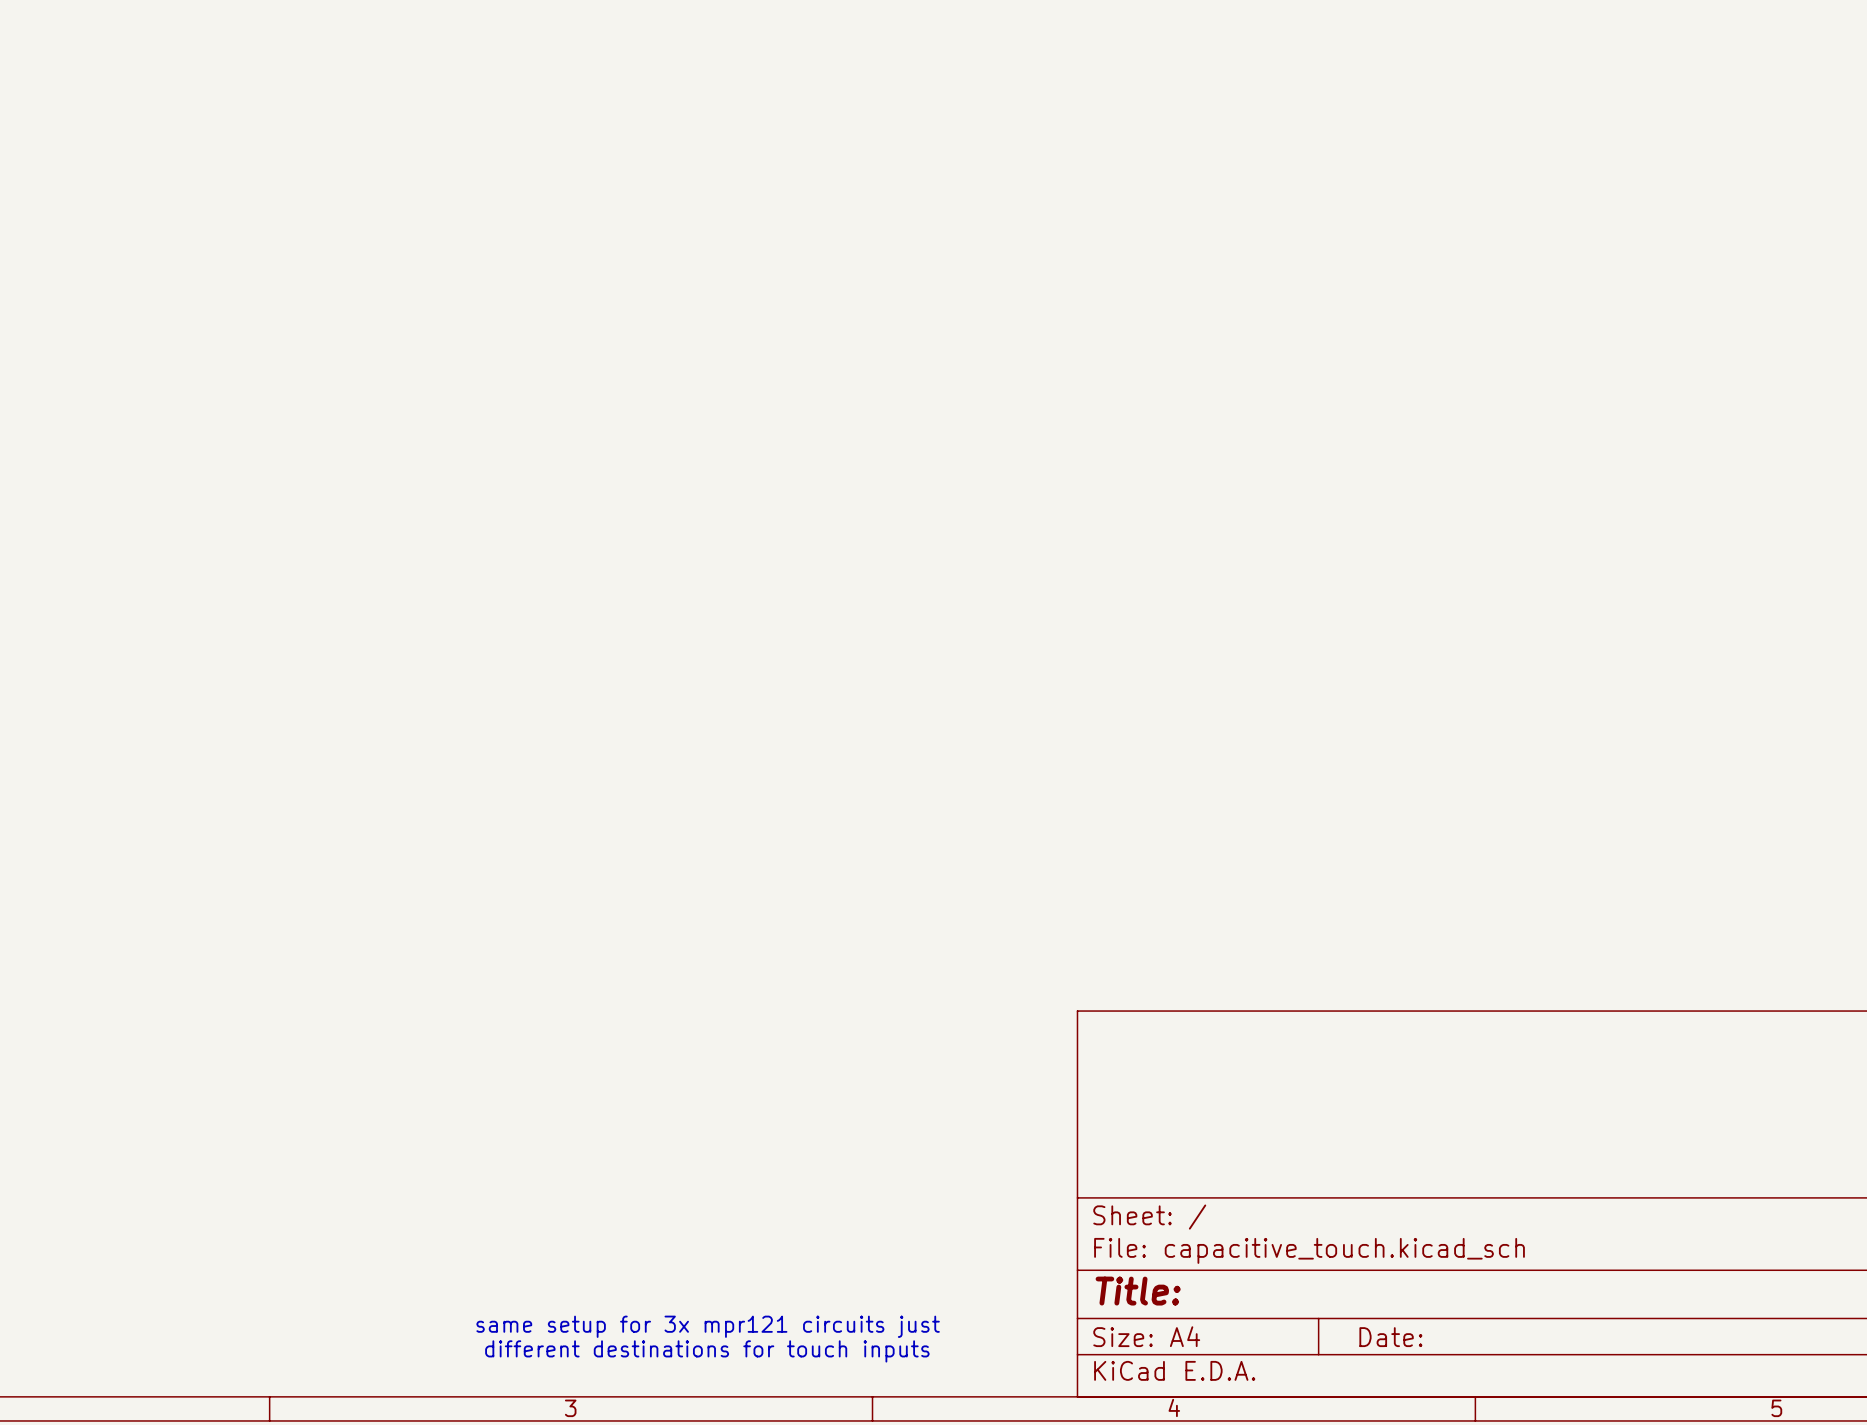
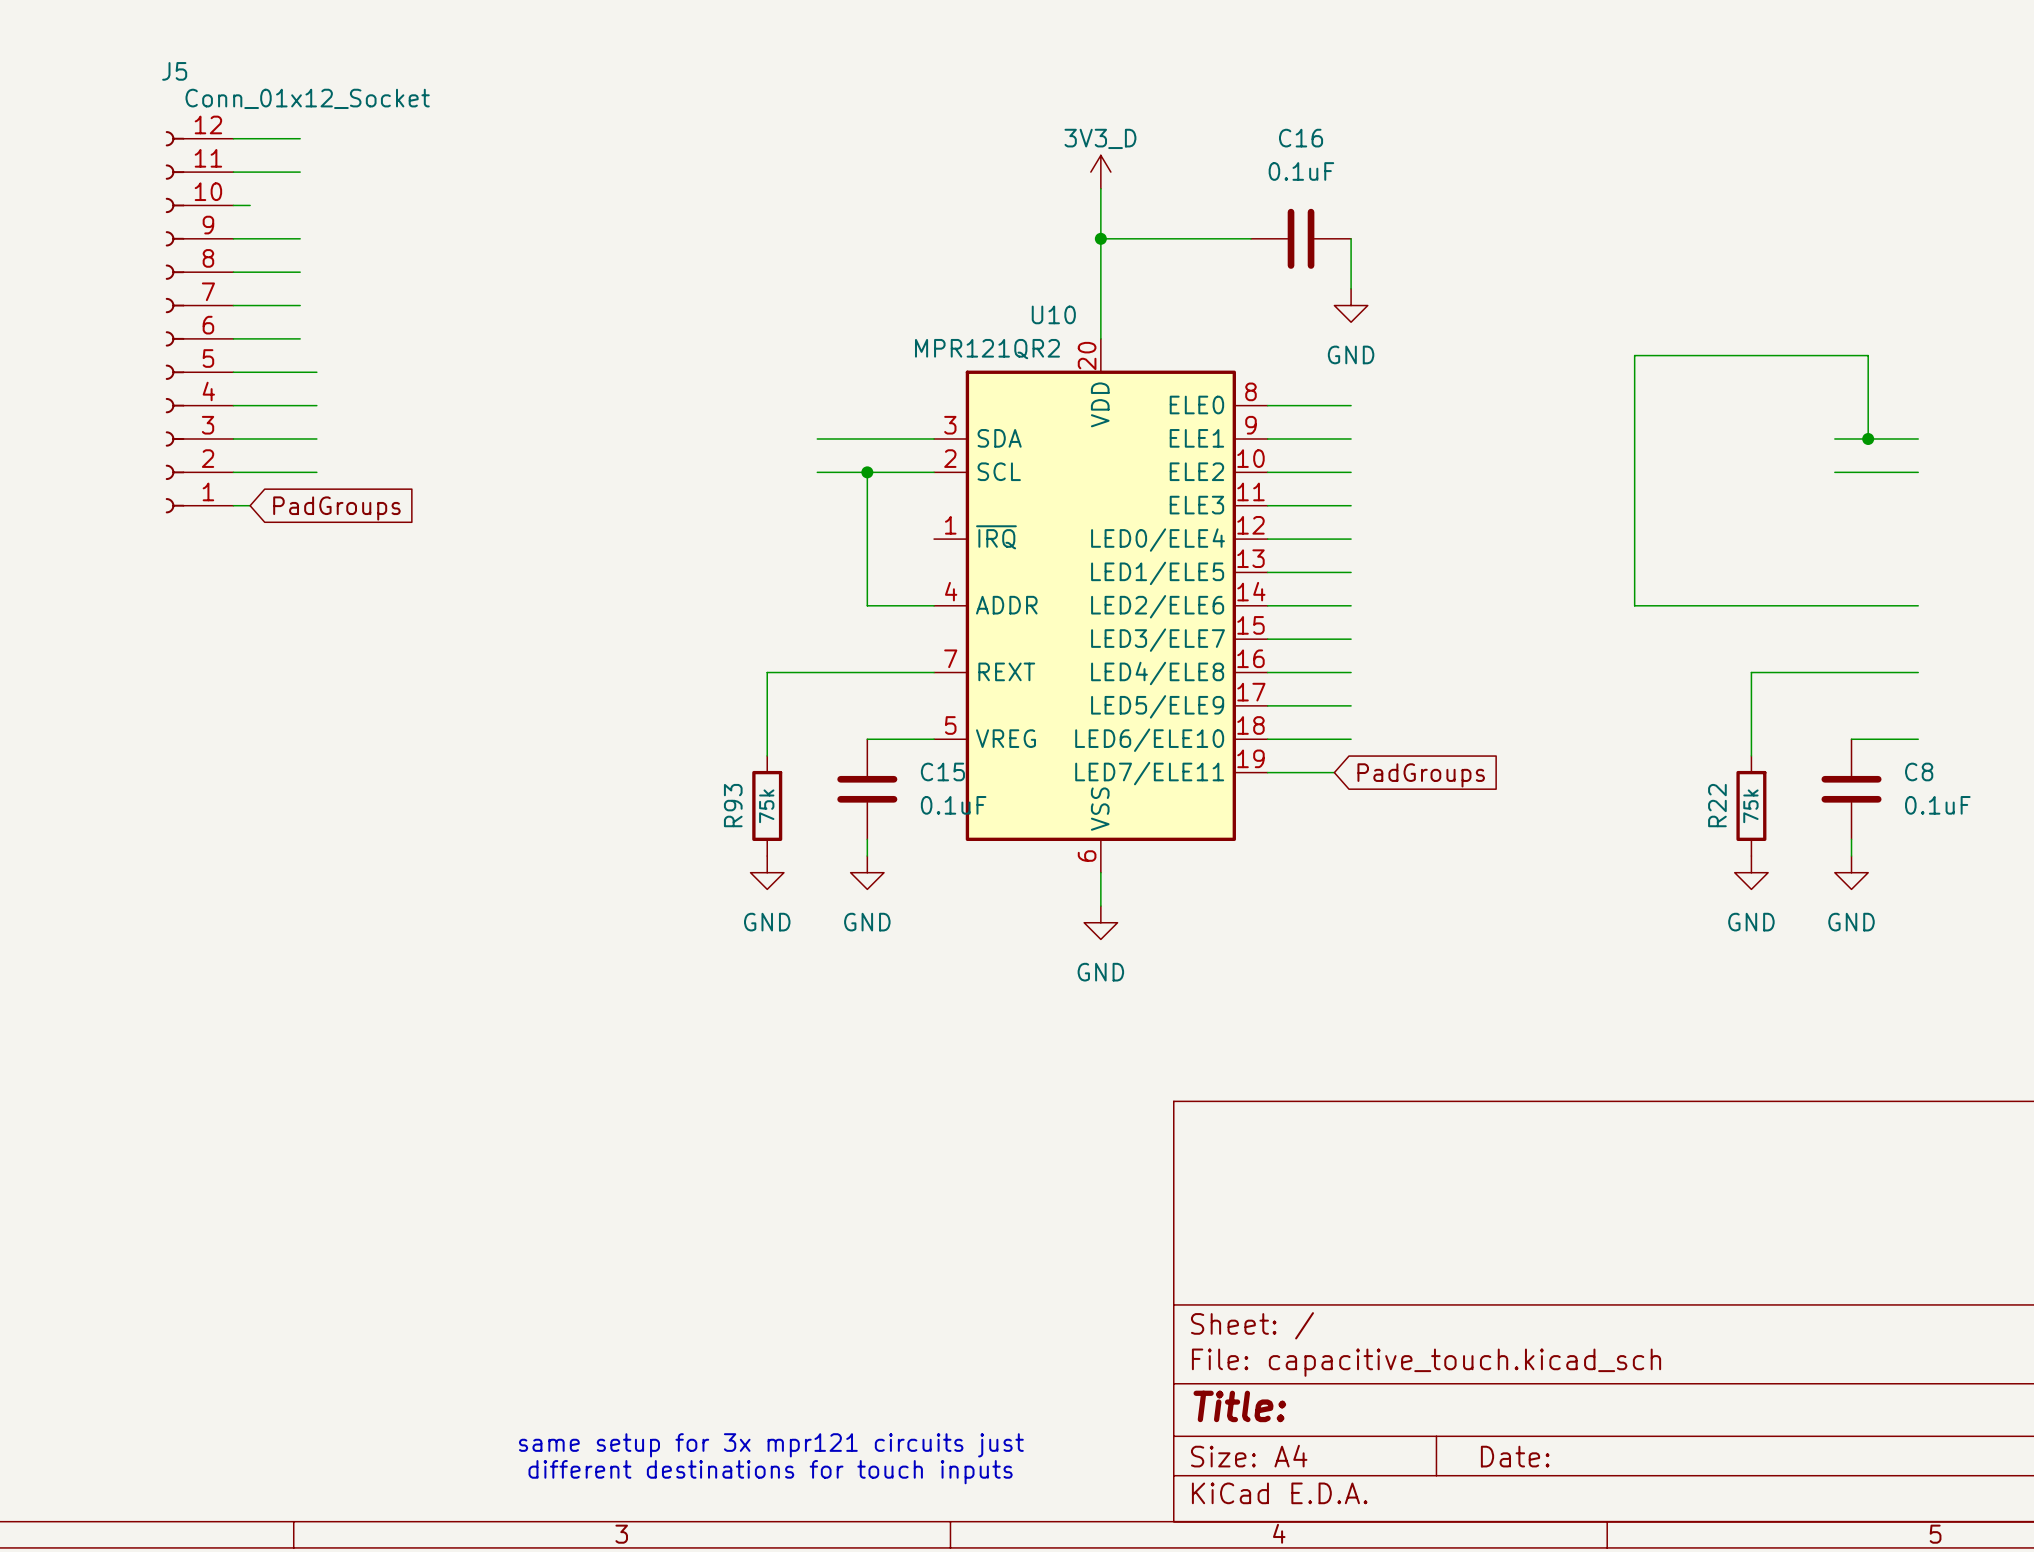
wire: none -> (233, 138) (300, 138)
wire: none -> (233, 172) (300, 172)
power symbol: none -> 3V3_D (1100, 172)
wire: none -> (1100, 188) (1100, 338)
wire: none -> (233, 205) (250, 205)
wire: none -> (233, 238) (300, 238)
wire: none -> (1100, 238) (1250, 238)
junction: none -> (1100, 238)
C16: none -> 0.1uF (1301, 238)
wire: none -> (1351, 238) (1351, 288)
wire: none -> (233, 272) (300, 272)
wire: none -> (233, 305) (300, 305)
power symbol: none -> GND (1351, 305)
J5: none -> Conn_01x12_Socket (199, 322)
wire: none -> (233, 338) (300, 338)
wire: none -> (233, 372) (316, 372)
wire: none -> (233, 405) (316, 405)
wire: none -> (1267, 405) (1351, 405)
wire: none -> (233, 438) (316, 438)
wire: none -> (817, 438) (934, 438)
wire: none -> (1267, 438) (1351, 438)
wire: none -> (1834, 438) (1918, 438)
wire: none -> (1868, 438) (1868, 355) (1634, 355) (1634, 605) (1918, 605)
junction: none -> (1868, 438)
wire: none -> (233, 472) (316, 472)
wire: none -> (817, 472) (934, 472)
wire: none -> (867, 472) (867, 605) (934, 605)
junction: none -> (867, 472)
wire: none -> (1267, 472) (1351, 472)
wire: none -> (1834, 472) (1918, 472)
wire: none -> (233, 505) (250, 505)
wire: none -> (1267, 505) (1351, 505)
global label: none -> PadGroups (336, 508)
wire: none -> (1267, 539) (1351, 539)
wire: none -> (1267, 572) (1351, 572)
U10: none -> MPR121QR2 (1100, 605)
wire: none -> (1267, 605) (1351, 605)
wire: none -> (1267, 639) (1351, 639)
wire: none -> (934, 672) (767, 672) (767, 755)
wire: none -> (1267, 672) (1351, 672)
wire: none -> (1918, 672) (1751, 672) (1751, 755)
wire: none -> (1267, 705) (1351, 705)
wire: none -> (867, 739) (934, 739)
wire: none -> (1267, 739) (1351, 739)
wire: none -> (1851, 739) (1918, 739)
wire: none -> (1267, 772) (1334, 772)
global label: none -> PadGroups (1421, 775)
C15: none -> 0.1uF (867, 789)
C8: none -> 0.1uF (1851, 789)
R93: none -> 75k (767, 805)
R22: none -> 75k (1751, 805)
wire: none -> (867, 839) (867, 856)
wire: none -> (1851, 839) (1851, 856)
power symbol: none -> GND (767, 872)
power symbol: none -> GND (867, 872)
wire: none -> (1100, 872) (1100, 906)
power symbol: none -> GND (1751, 872)
power symbol: none -> GND (1851, 872)
power symbol: none -> GND (1100, 922)

